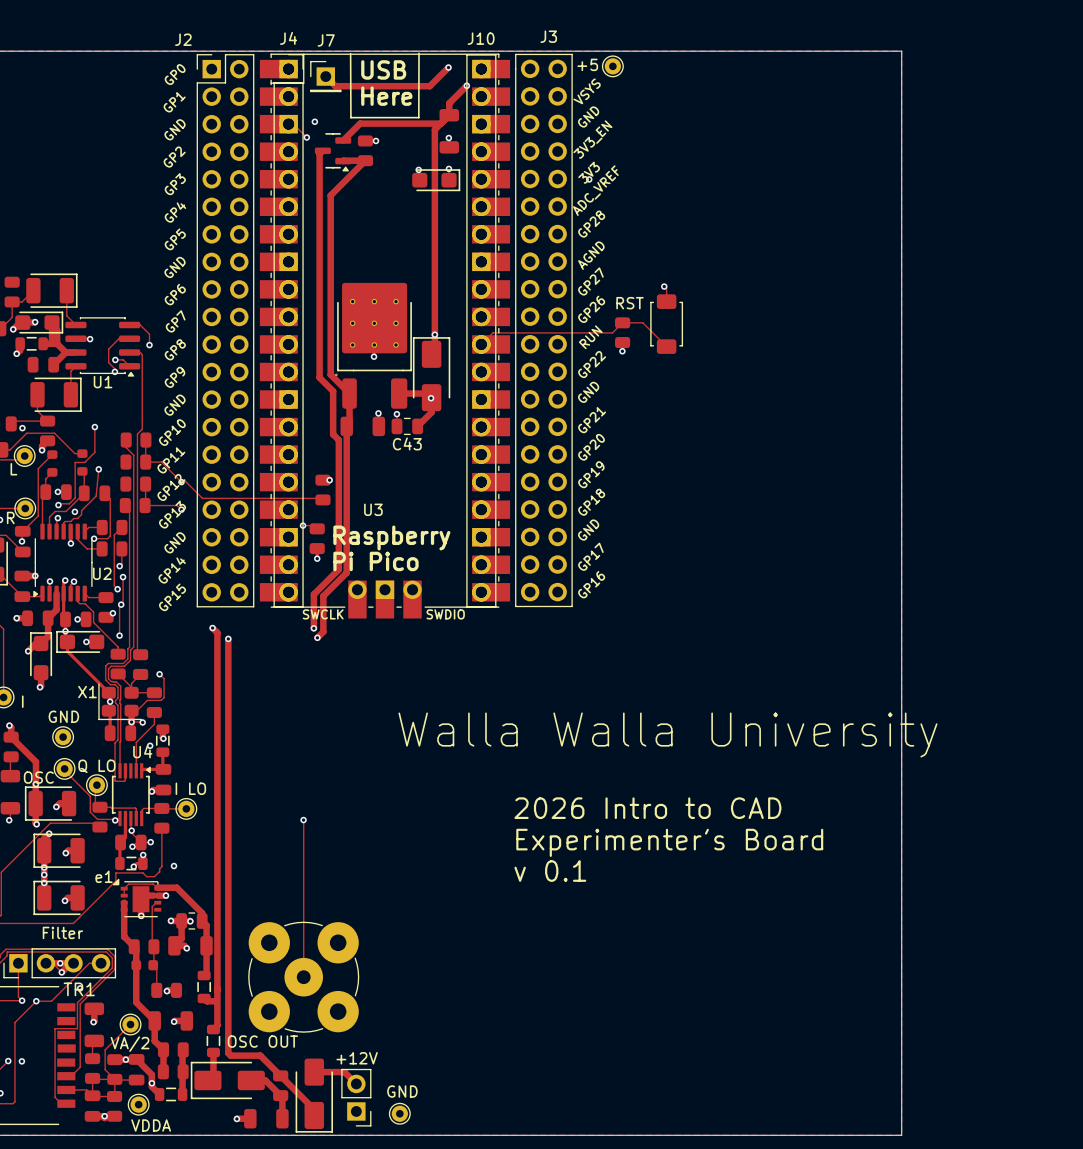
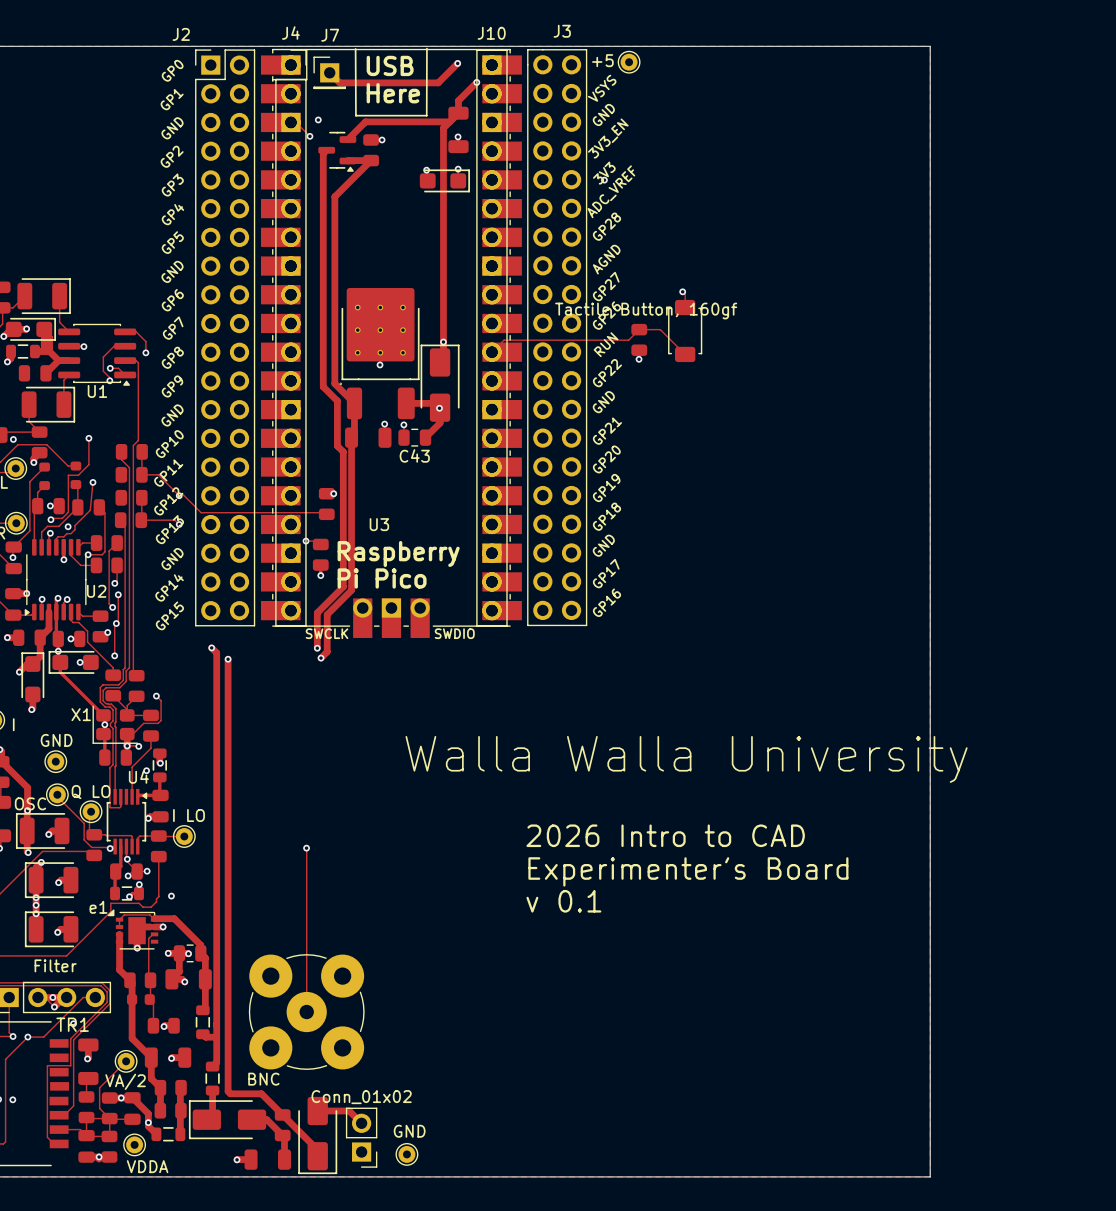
part value: RST (630, 303) -> Tactile Button, 160gf (646, 311)
part value: OSC OUT (262, 1041) -> BNC (263, 1079)
part value: +12V (357, 1058) -> Conn_01x02 (361, 1097)

